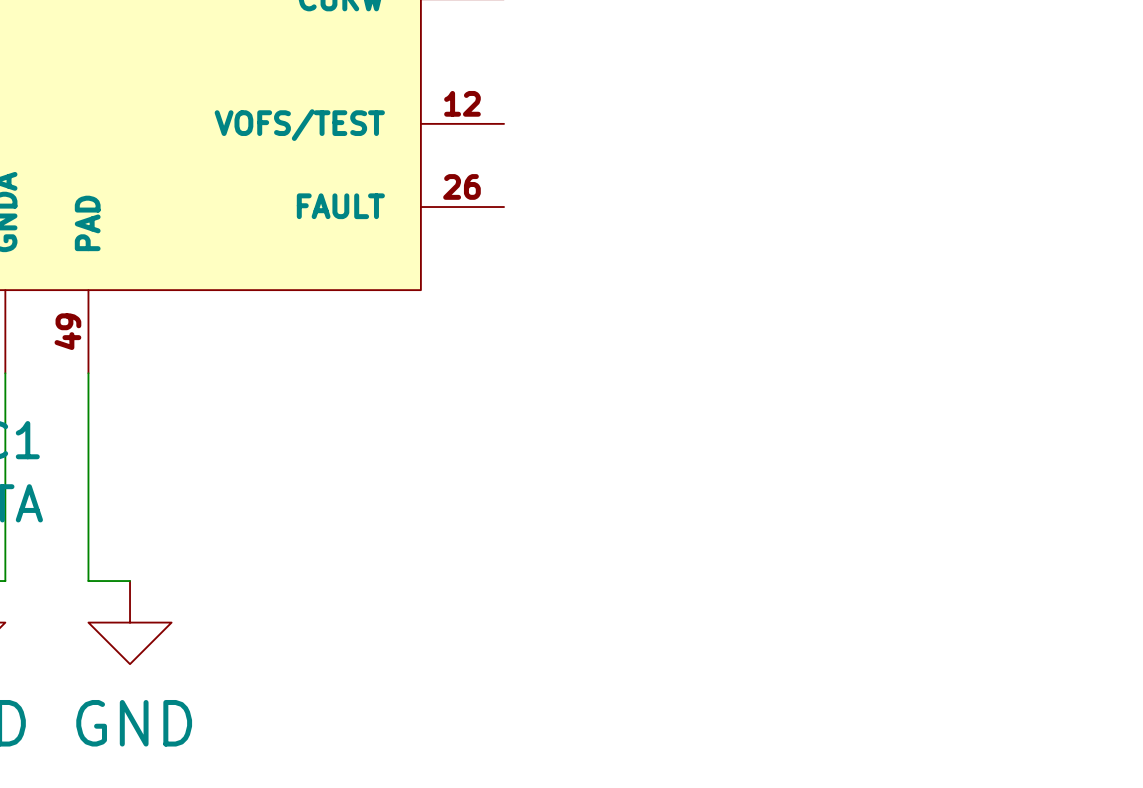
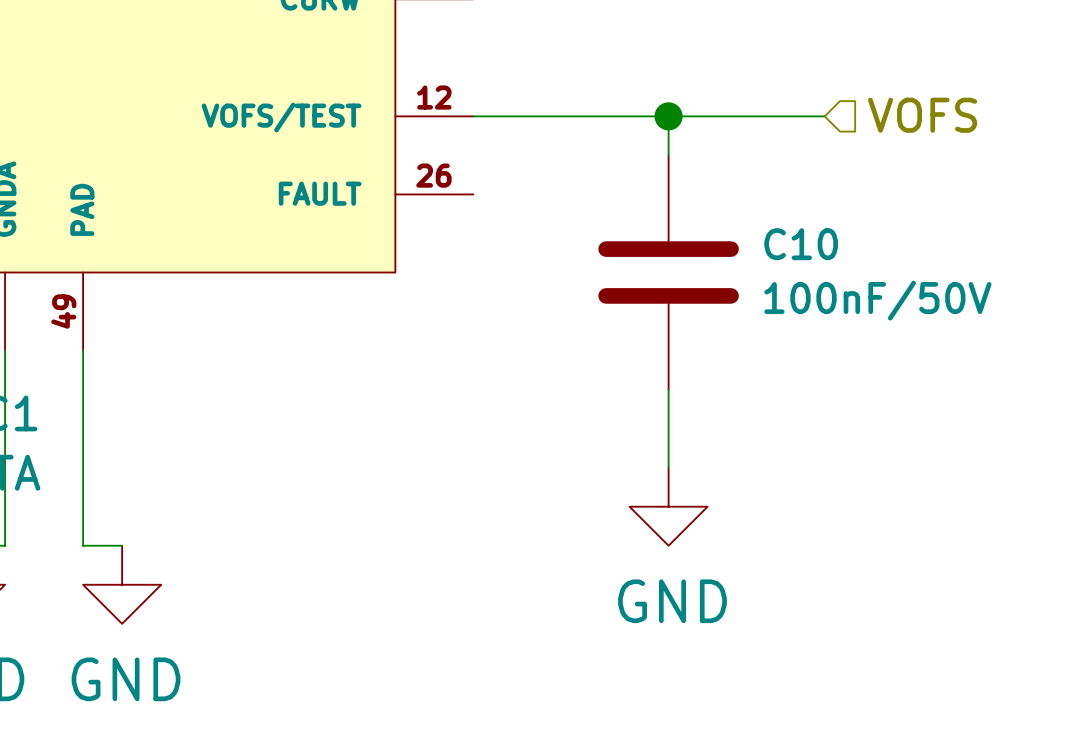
hierarchical label: none -> VOFS (922, 115)
wire: none -> (473, 116) (824, 116)
wire: none -> (668, 116) (668, 155)
junction: none -> (668, 116)
C10: none -> 100nF/50V (668, 272)
wire: none -> (668, 389) (668, 467)
power symbol: none -> GND (668, 506)

